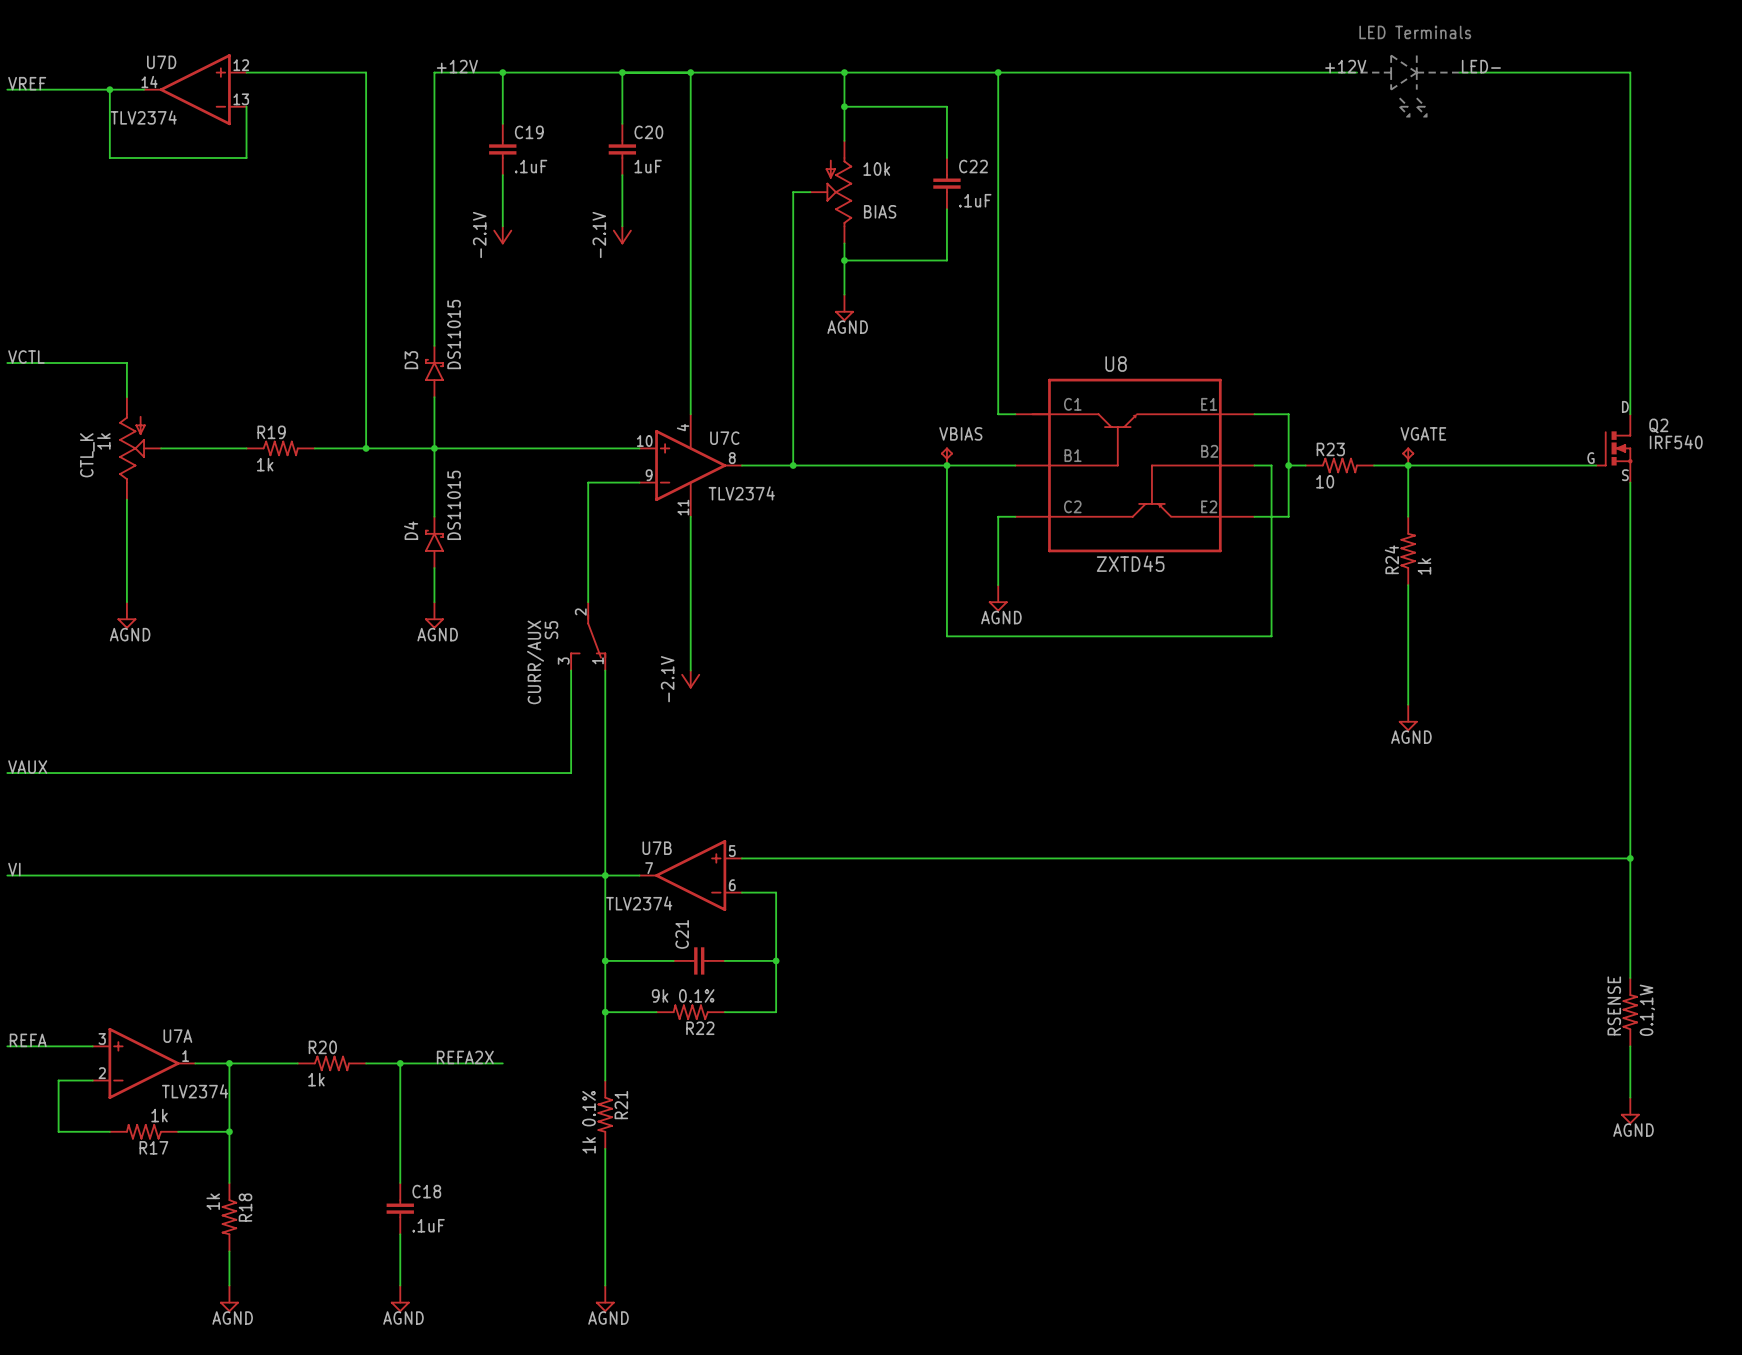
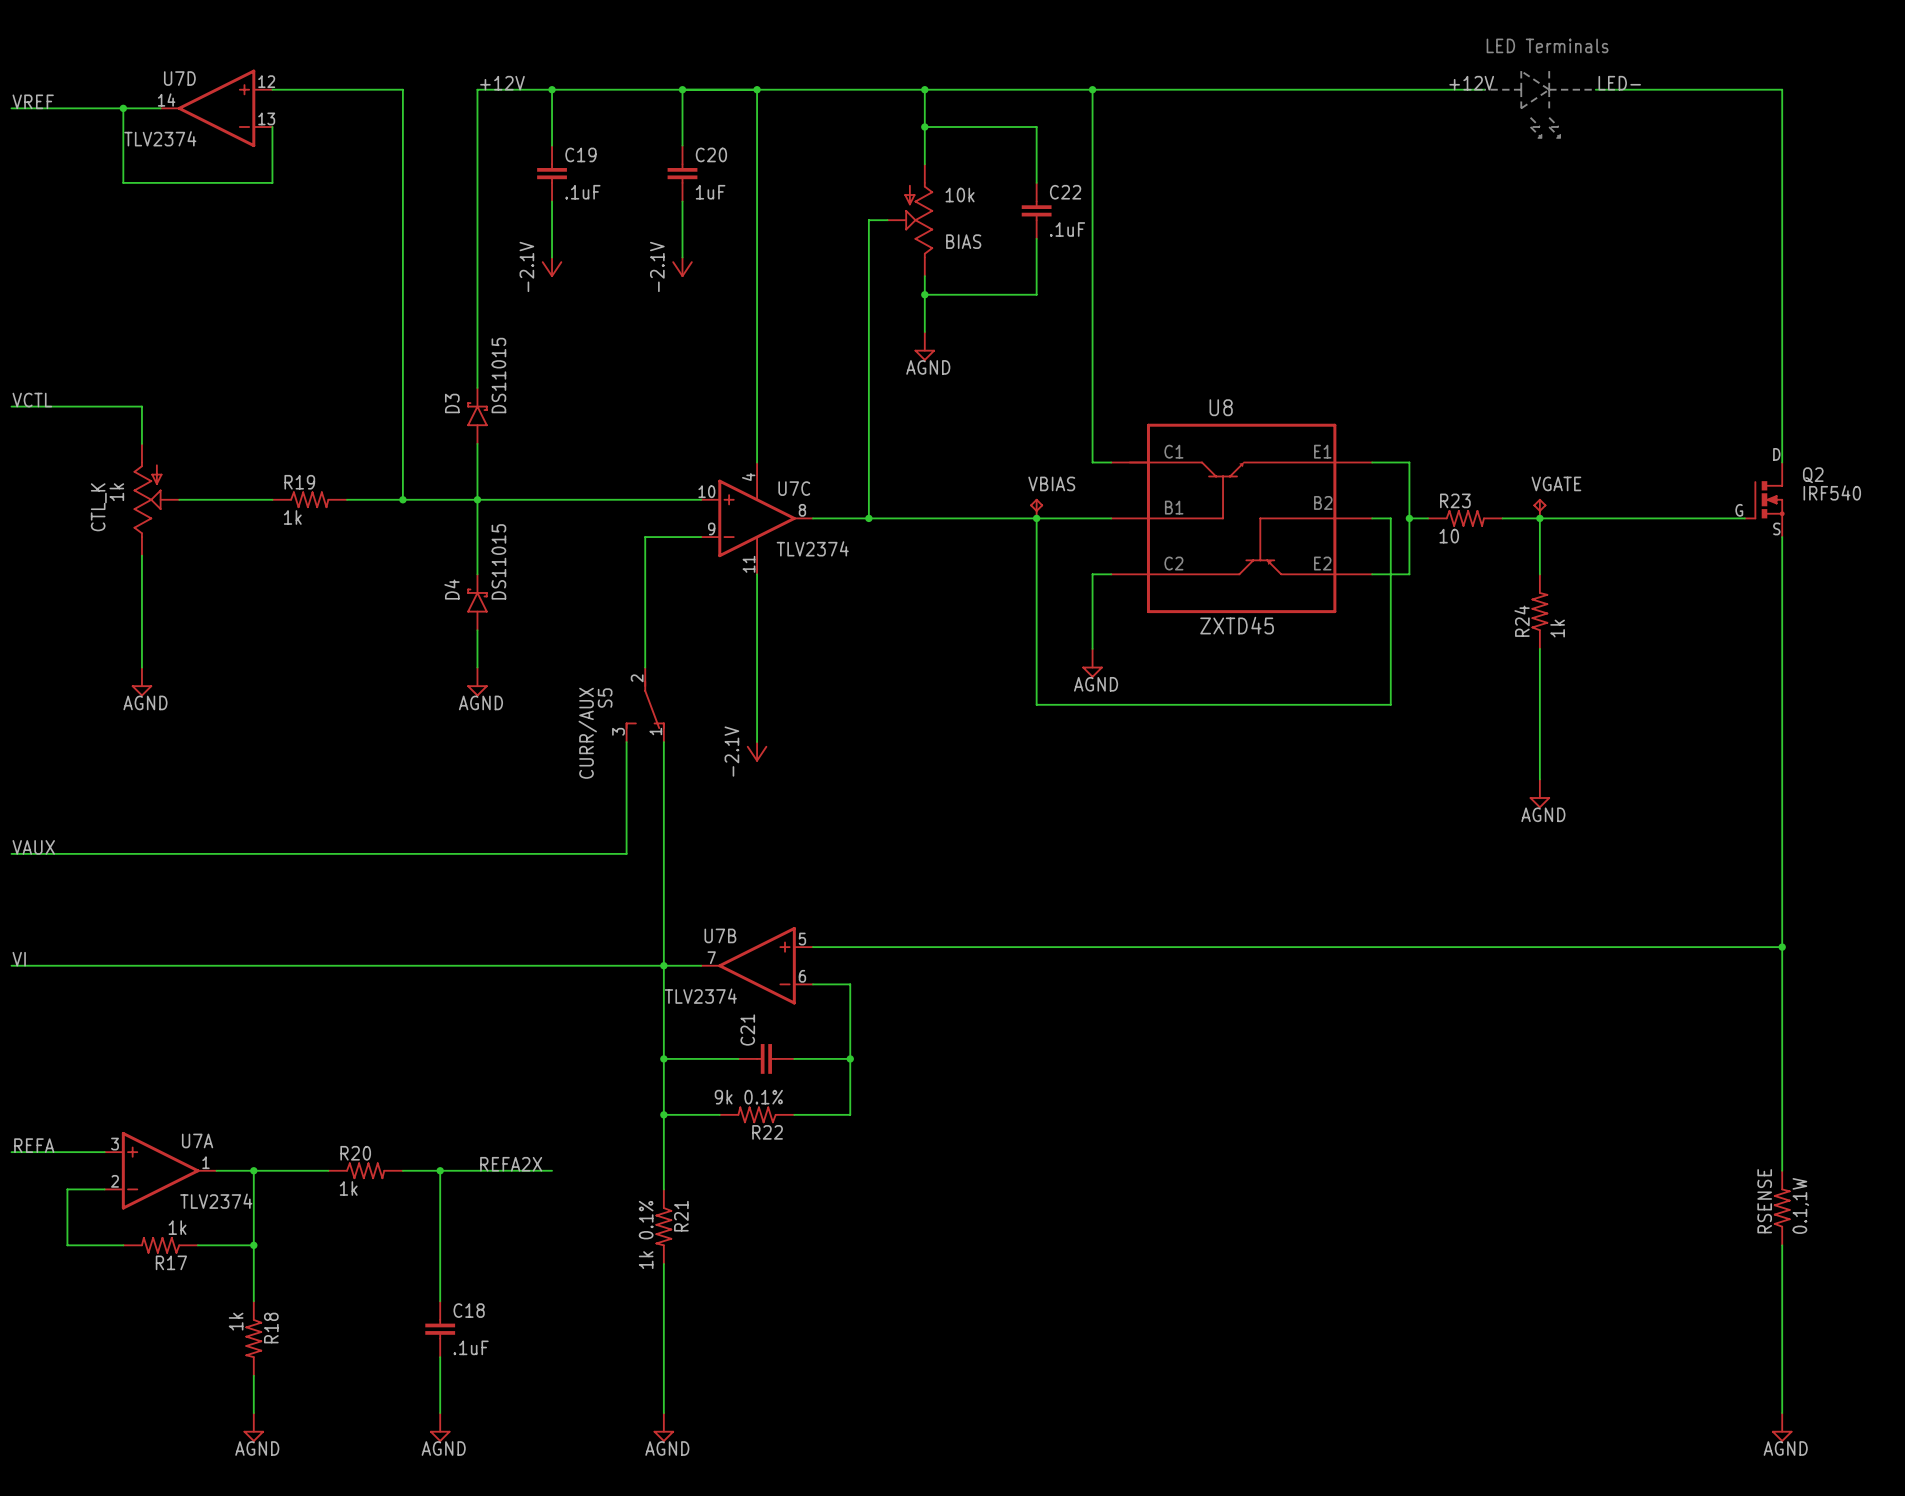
RSENSE position: (1630, 1012) -> (1782, 1208)
power symbol: AGND (1630, 1110) -> none
wire: none -> (1782, 1245) (1782, 1413)
power symbol: none -> AGND (1782, 1427)

